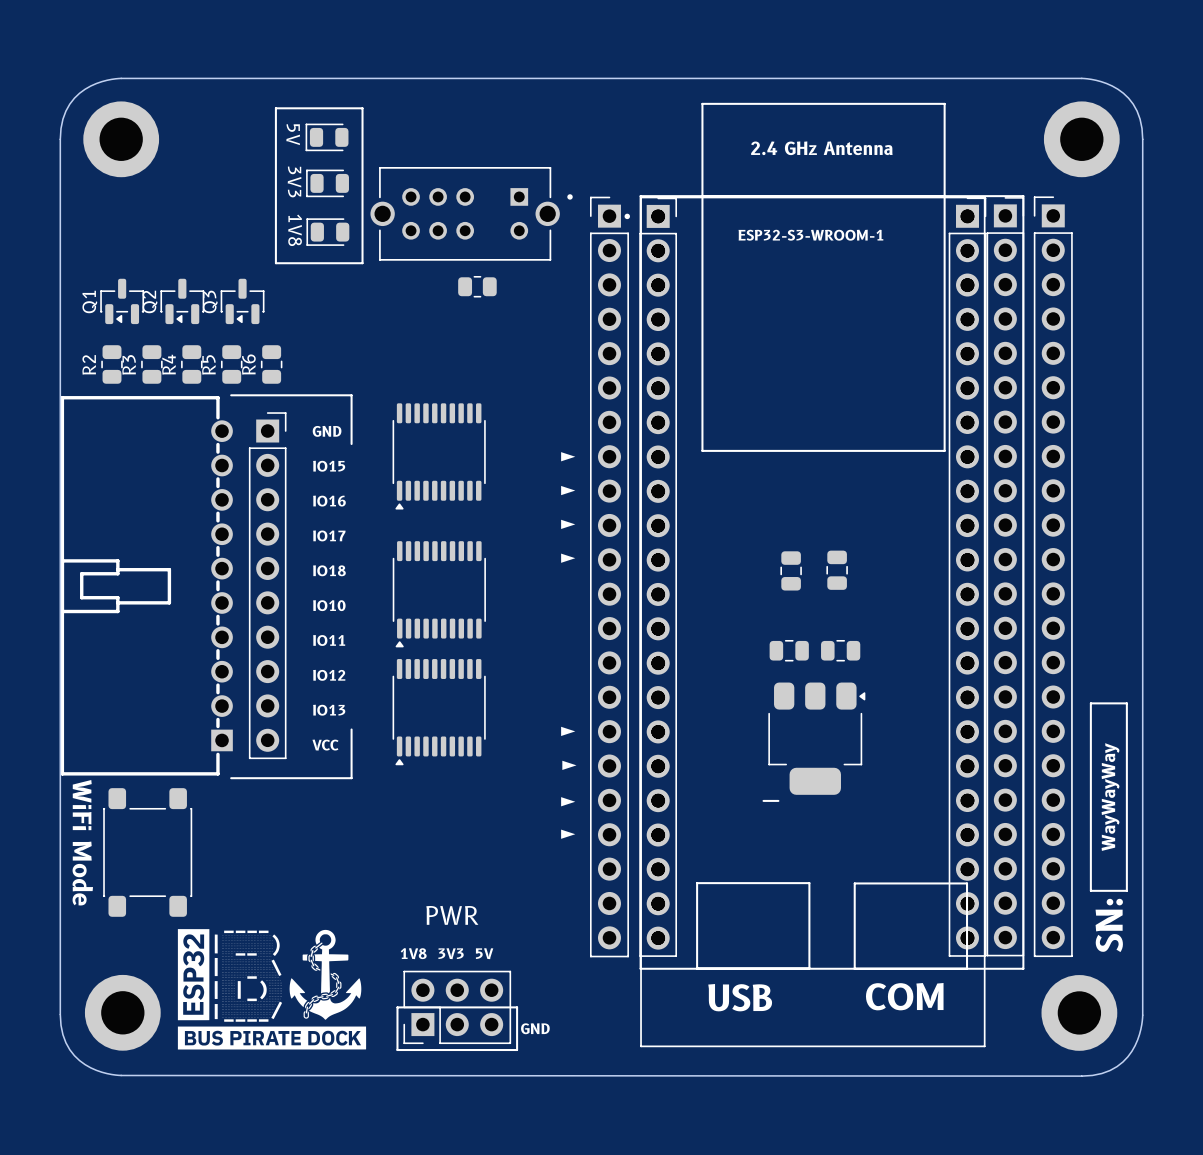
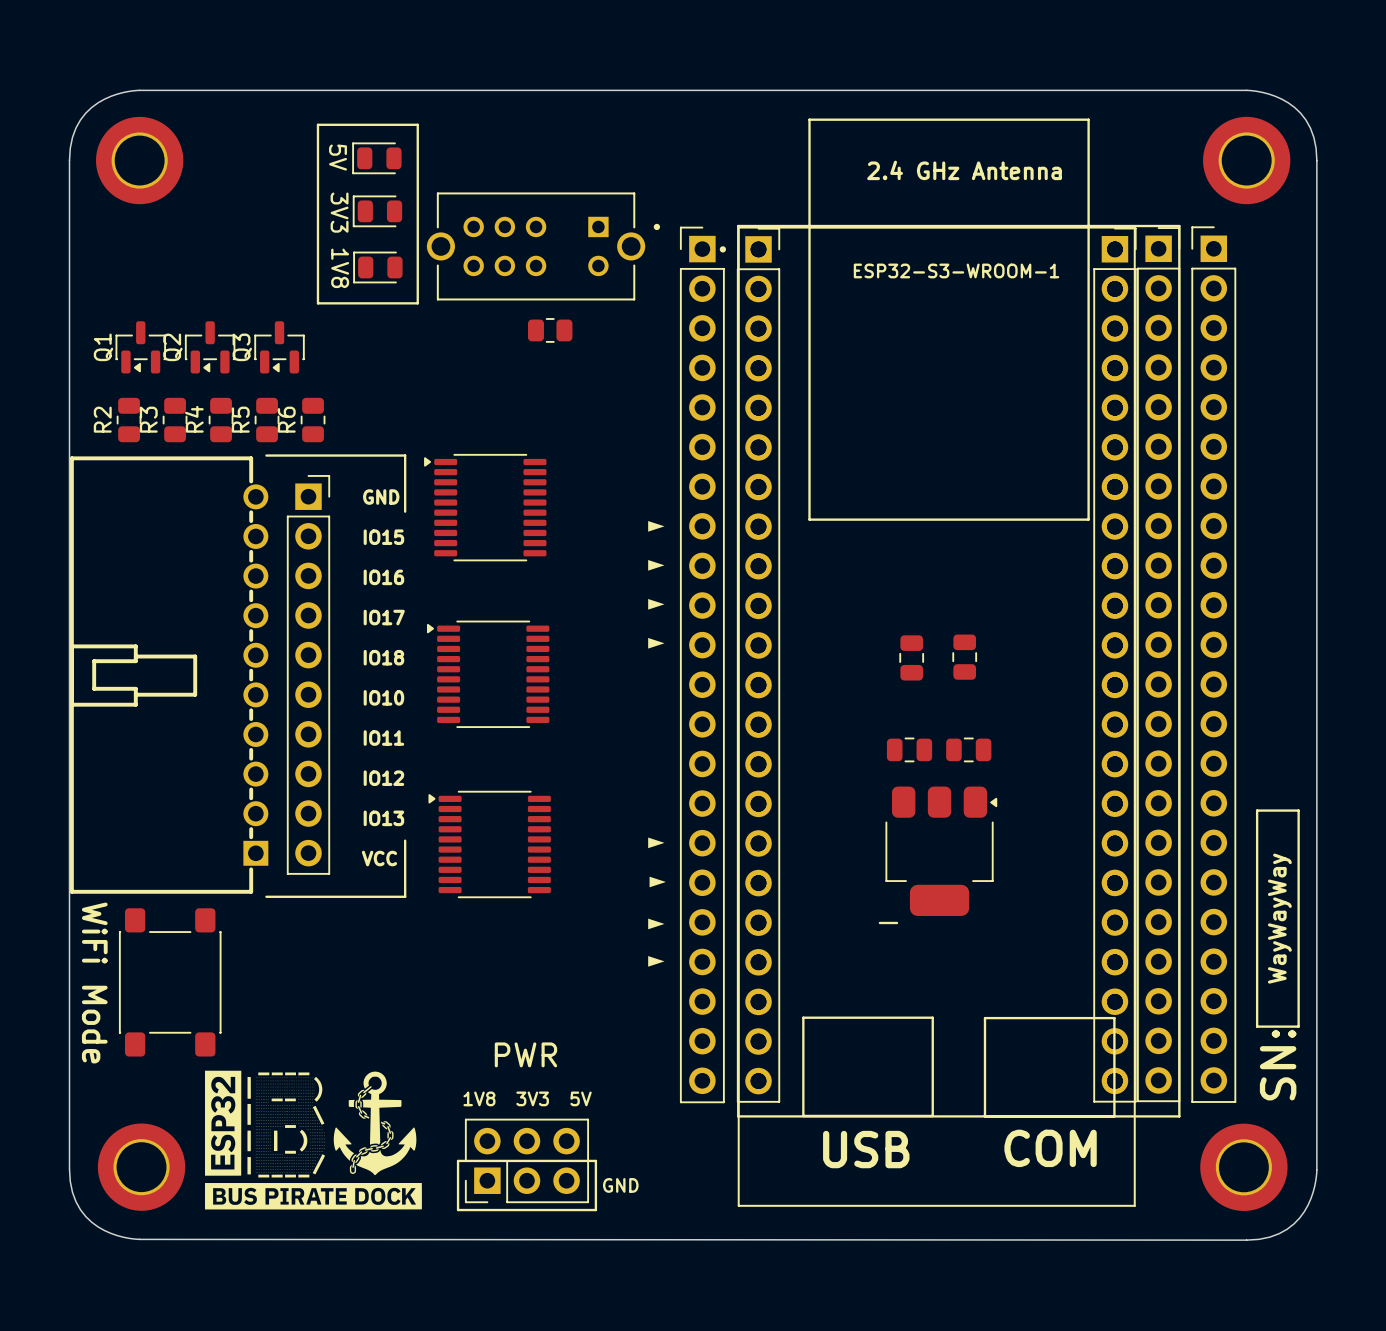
part rotation: 0° (439, 456) -> 90° clockwise (485, 507)
part rotation: 0° (439, 594) -> 90° clockwise (488, 674)
part rotation: 0° (439, 712) -> 90° clockwise (489, 844)

